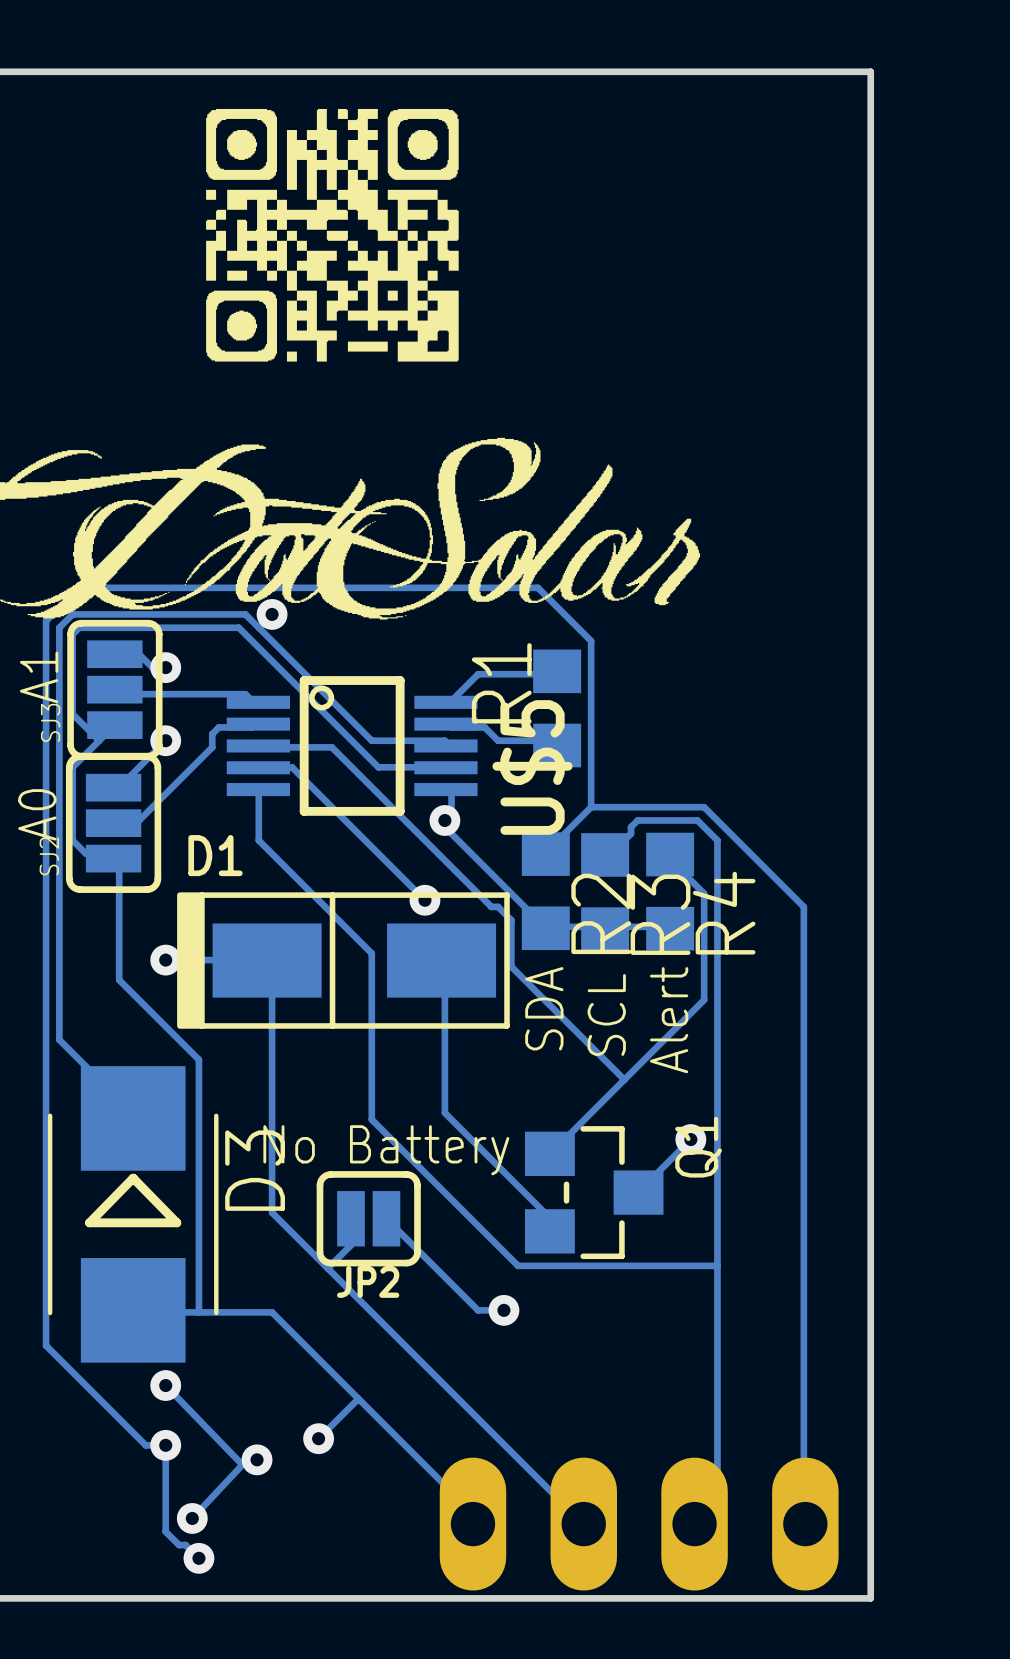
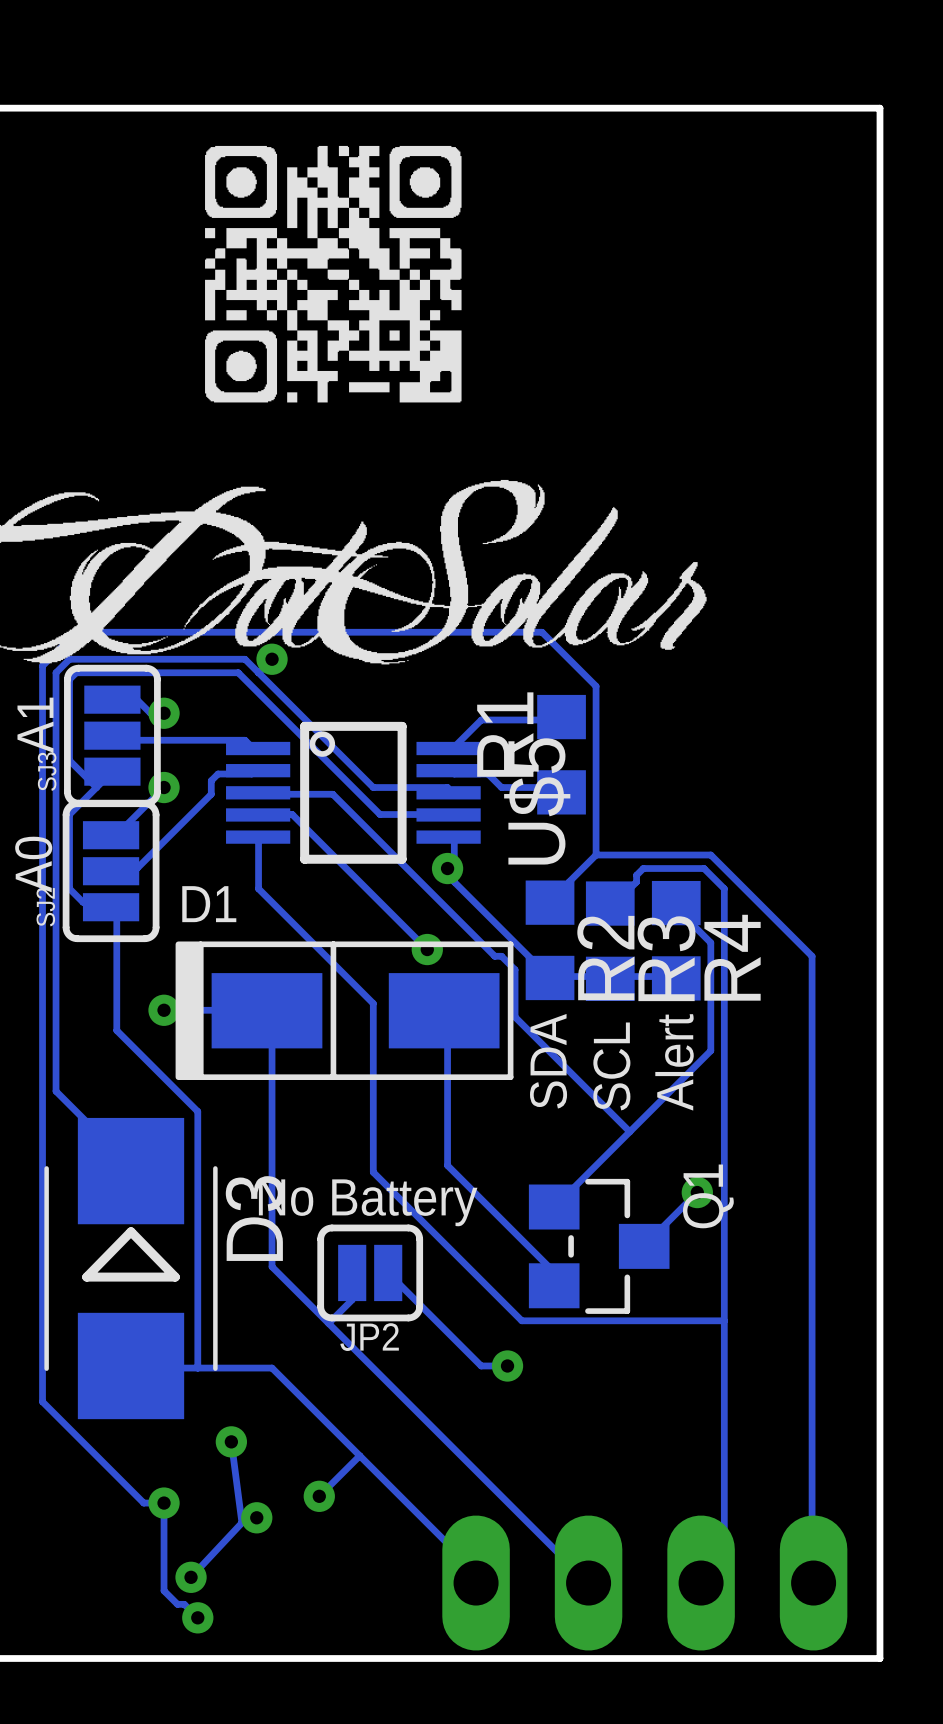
track: (165, 1385) (242, 1464) -> (231, 1441) (241, 1522)
via position: (165, 1385) -> (231, 1441)

